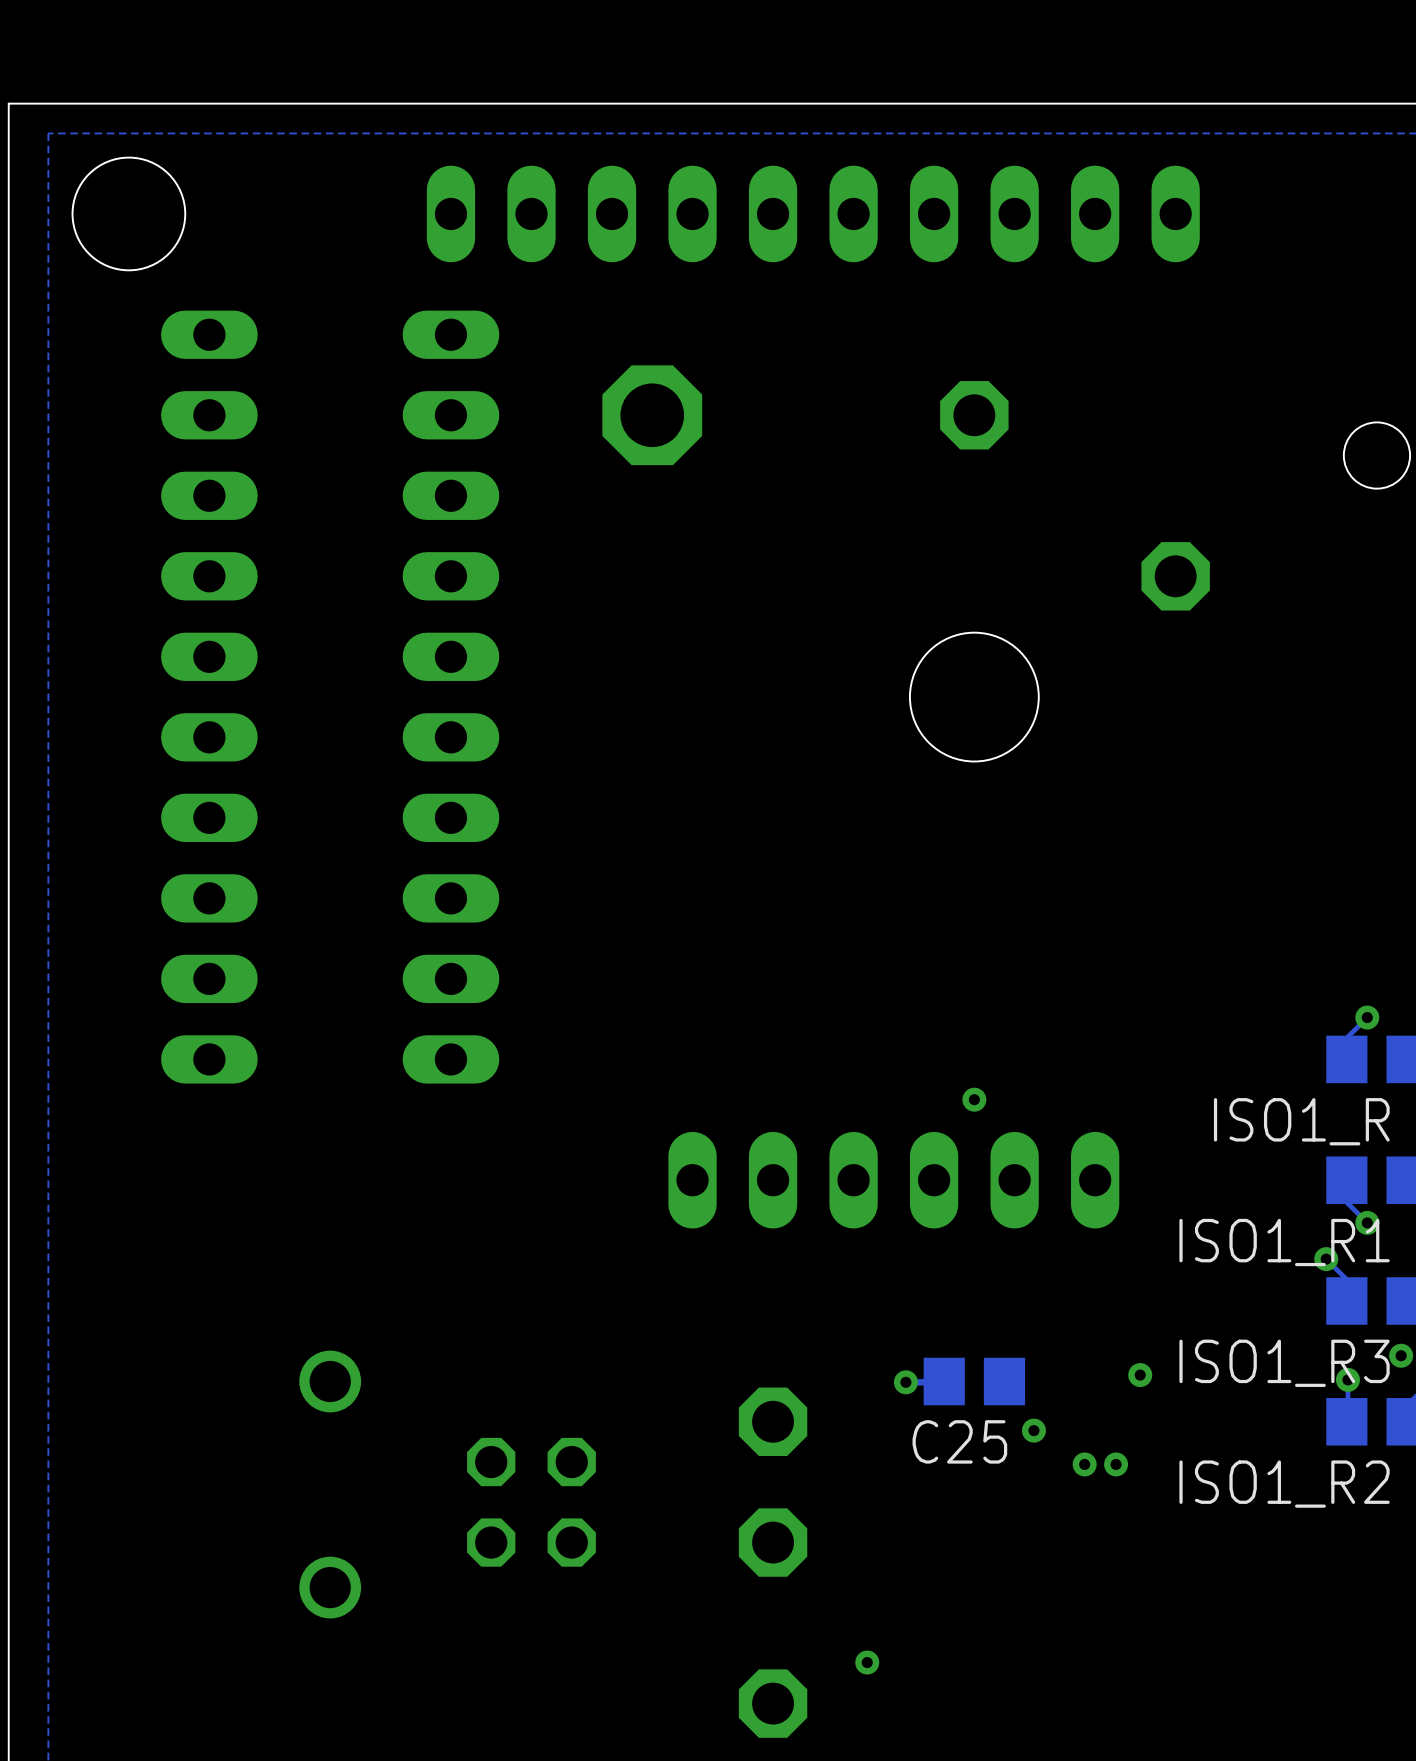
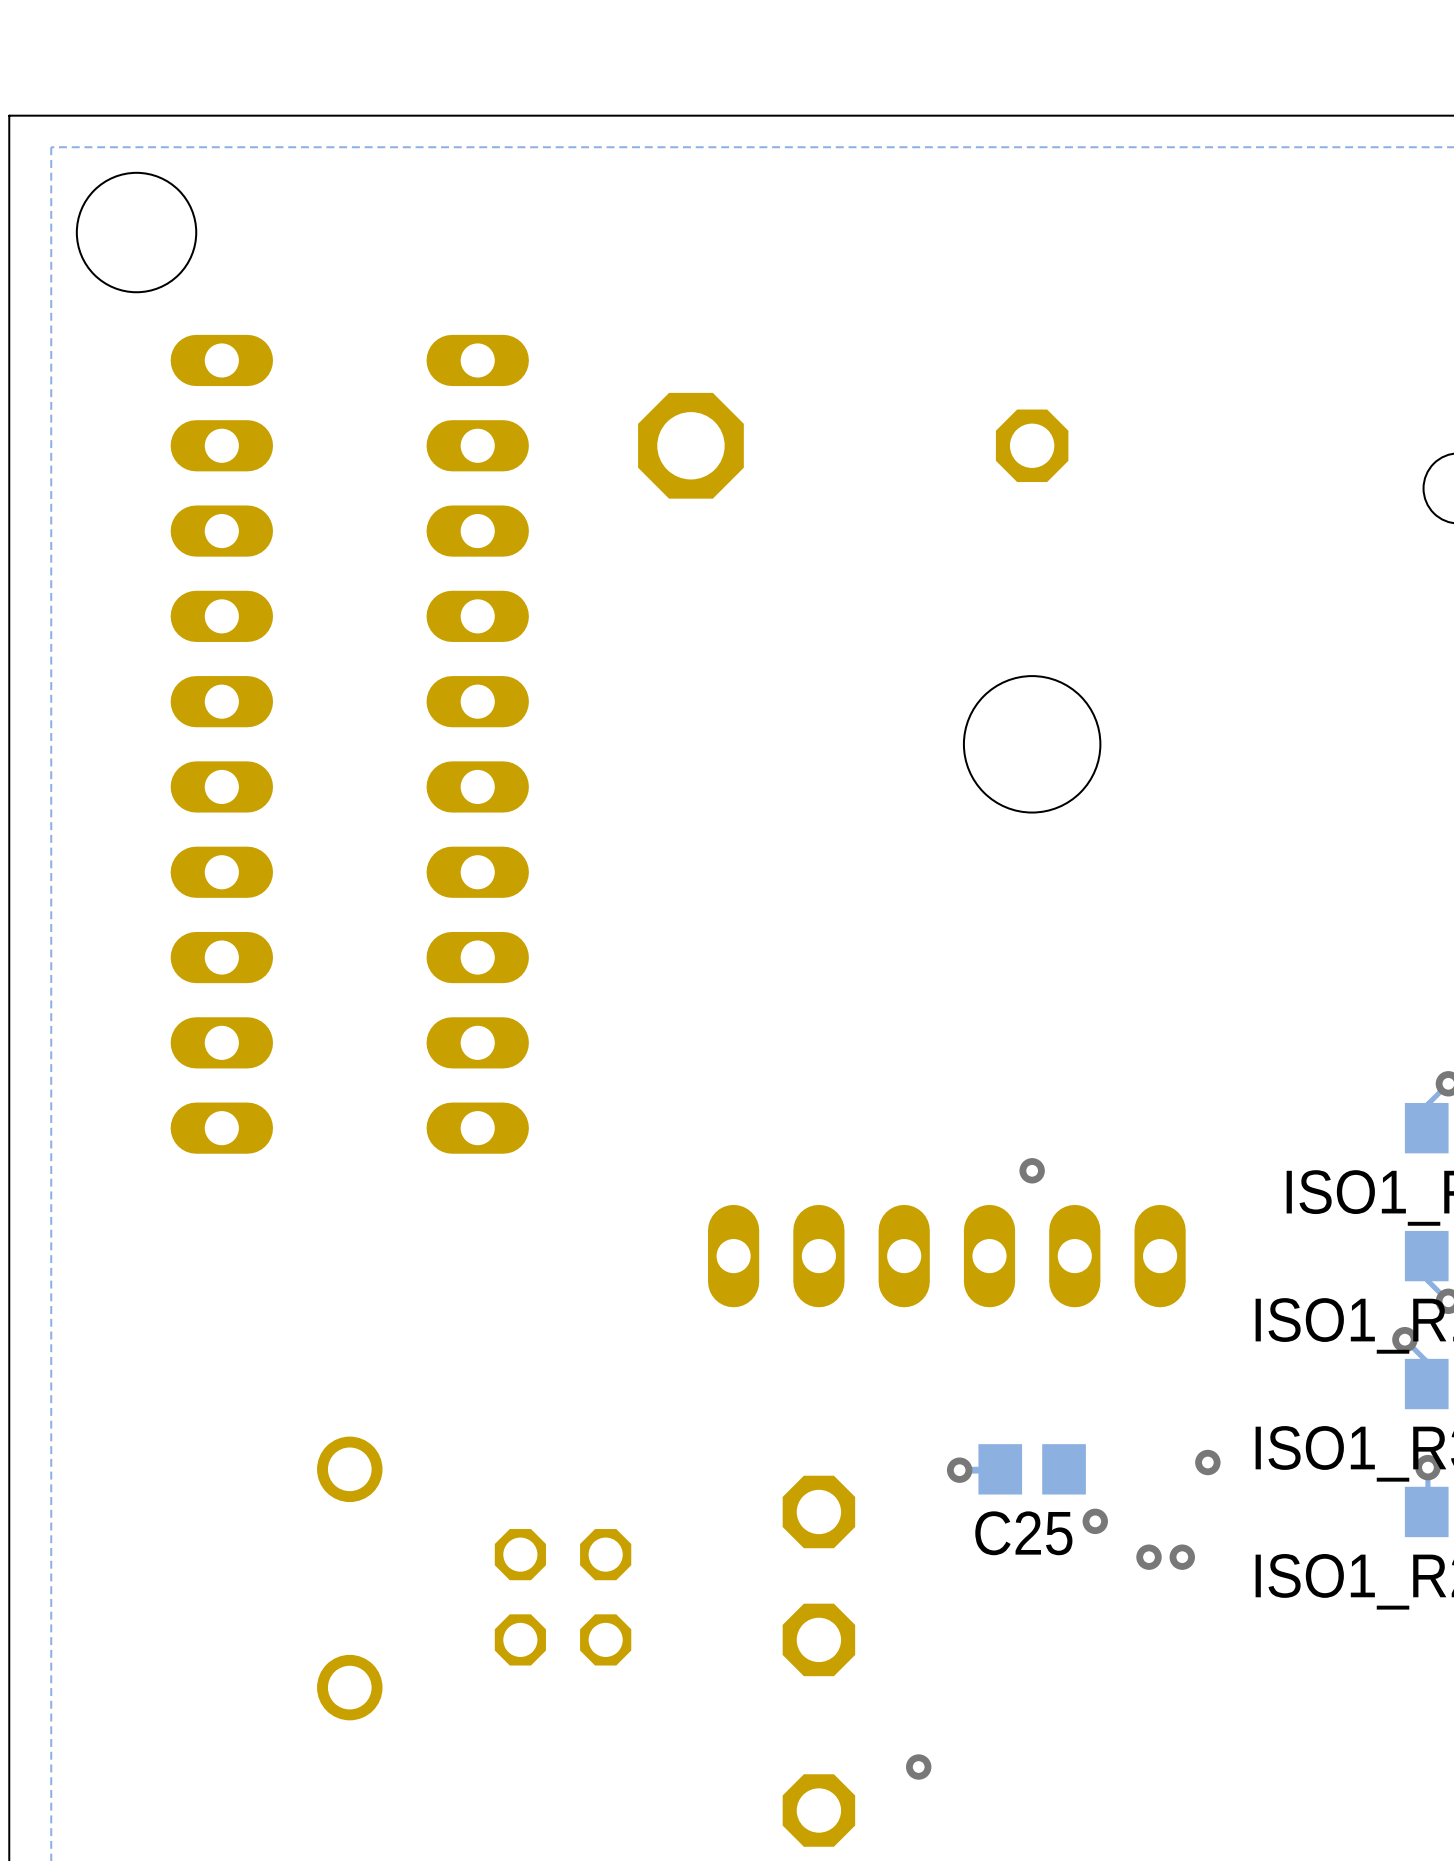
part: (813, 213) -> none
part: (1175, 576) -> none

